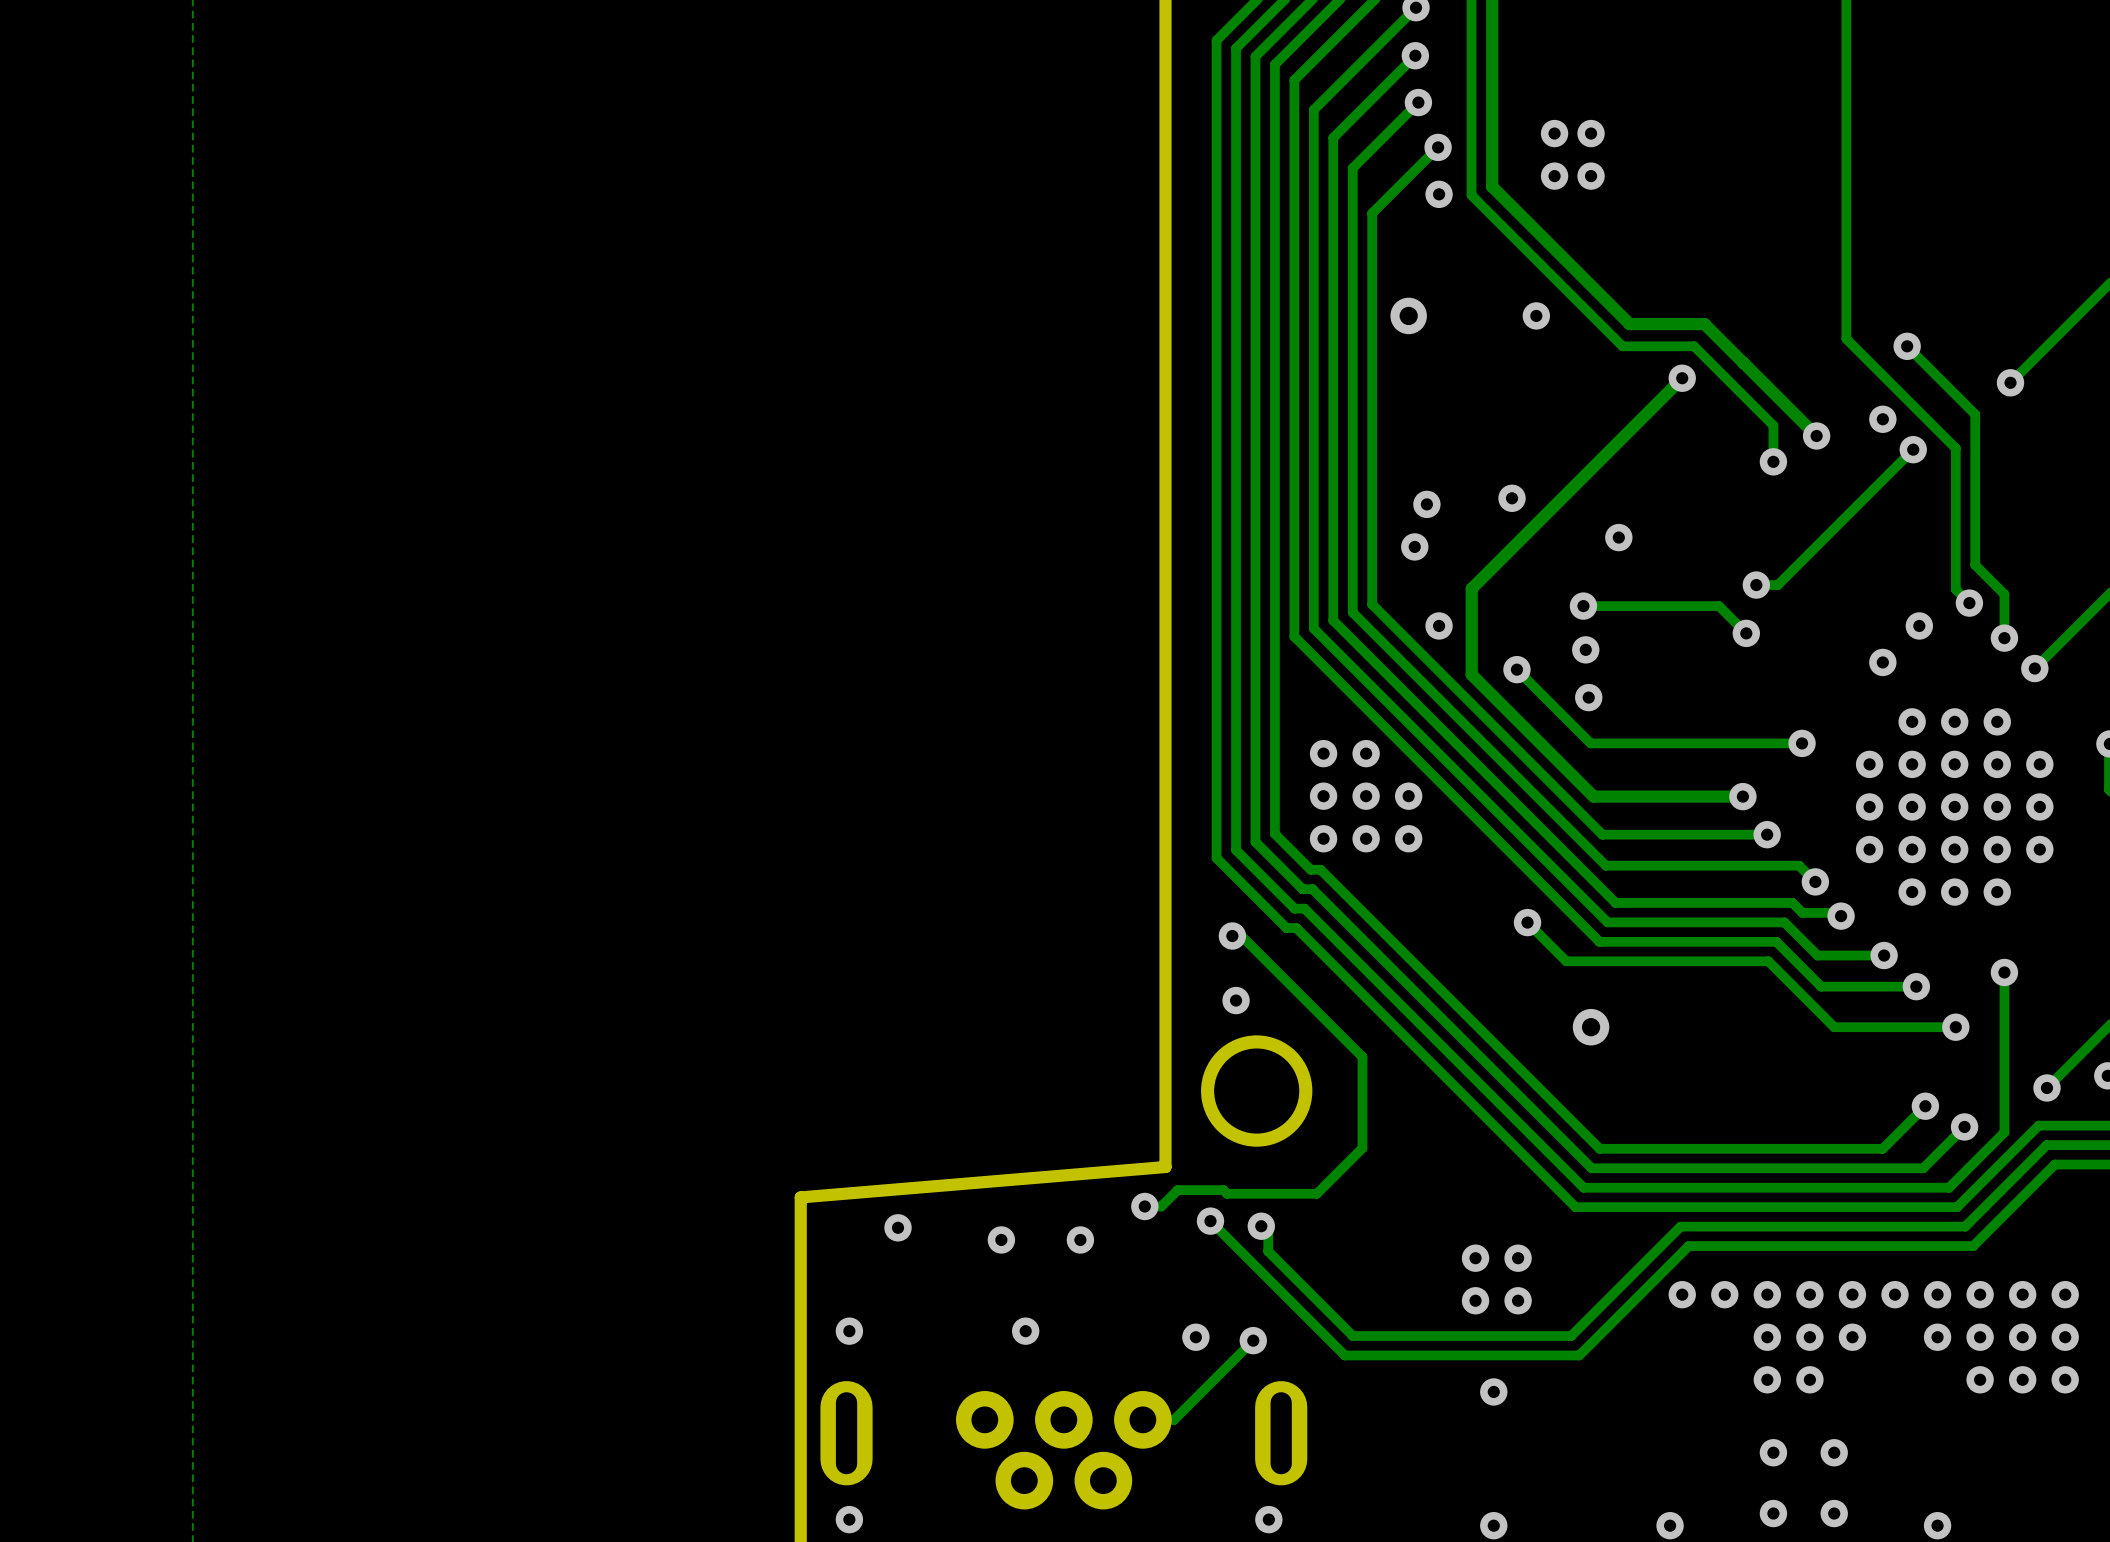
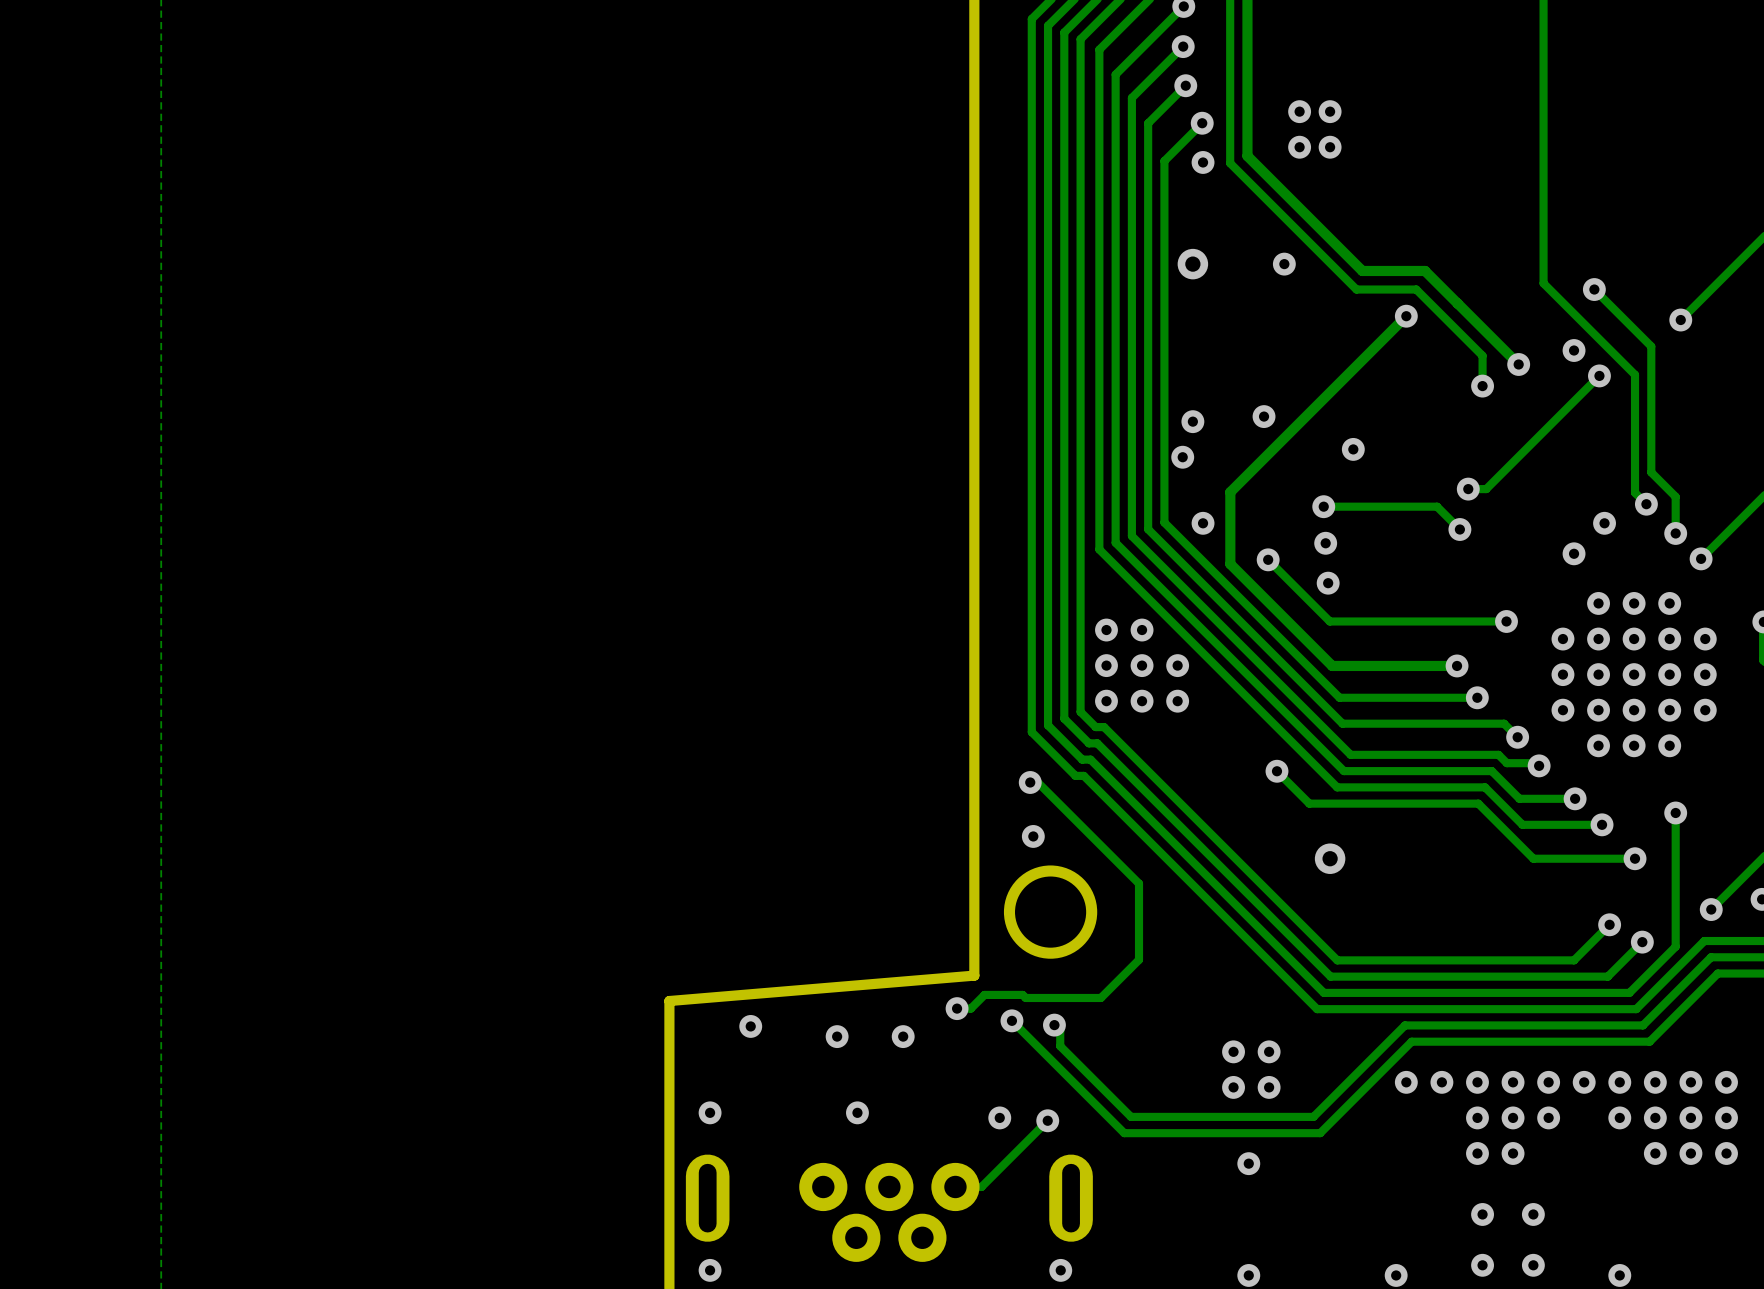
track: (1234, 22) (1216, 40) (1216, 858) (1234, 875) -> (1031, 19) (1031, 732)
track: (1253, 30) (1236, 48) (1236, 850) (1253, 867) -> (1048, 25) (1048, 725)
track: (1273, 38) (1255, 56) (1255, 842) (1273, 859) -> (1064, 32) (1064, 718)
track: (1292, 46) (1274, 64) (1274, 833) (1292, 851) -> (1080, 39) (1080, 711)
track: (1315, 59) (1294, 80) (1294, 636) (1315, 657) -> (1099, 49) (1099, 549)
track: (1334, 89) (1313, 109) (1313, 628) (1334, 649) -> (1115, 74) (1115, 542)
track: (1353, 117) (1333, 137) (1333, 620) (1353, 641) -> (1131, 97) (1131, 536)
track: (1373, 147) (1352, 168) (1352, 612) (1373, 633) -> (1148, 123) (1148, 529)
track: (1392, 192) (1372, 213) (1372, 604) (1392, 625) -> (1164, 161) (1164, 522)
via position: (1408, 315) -> (1192, 264)

